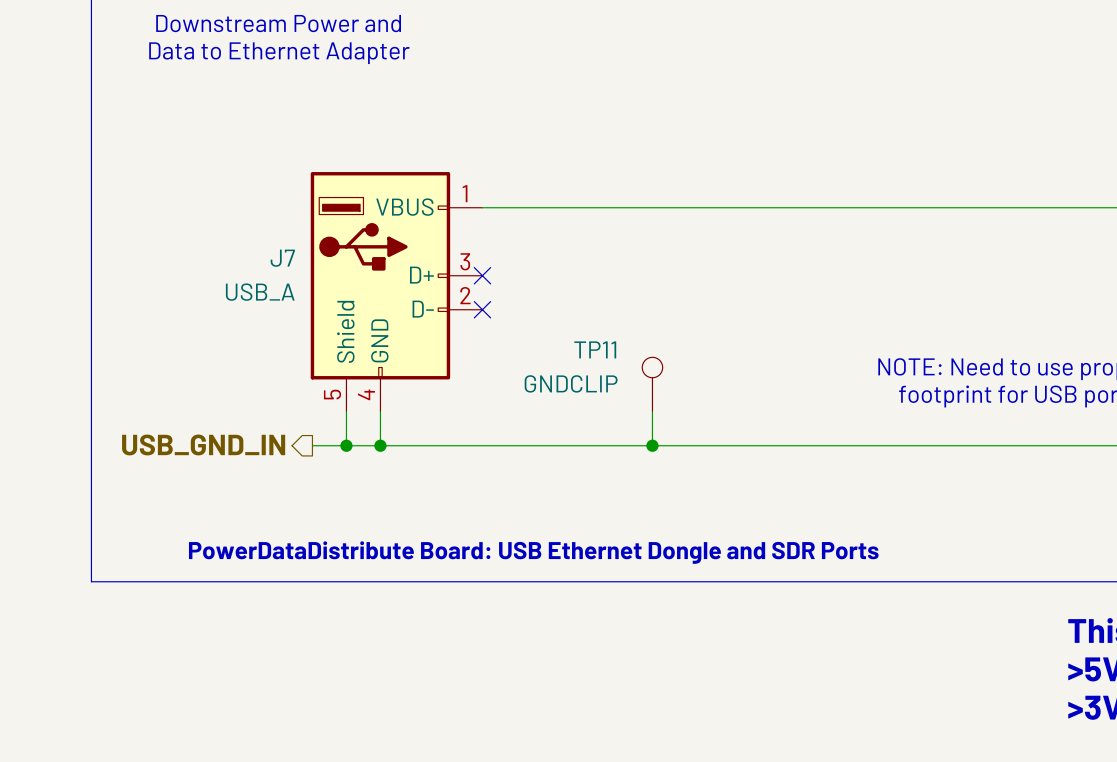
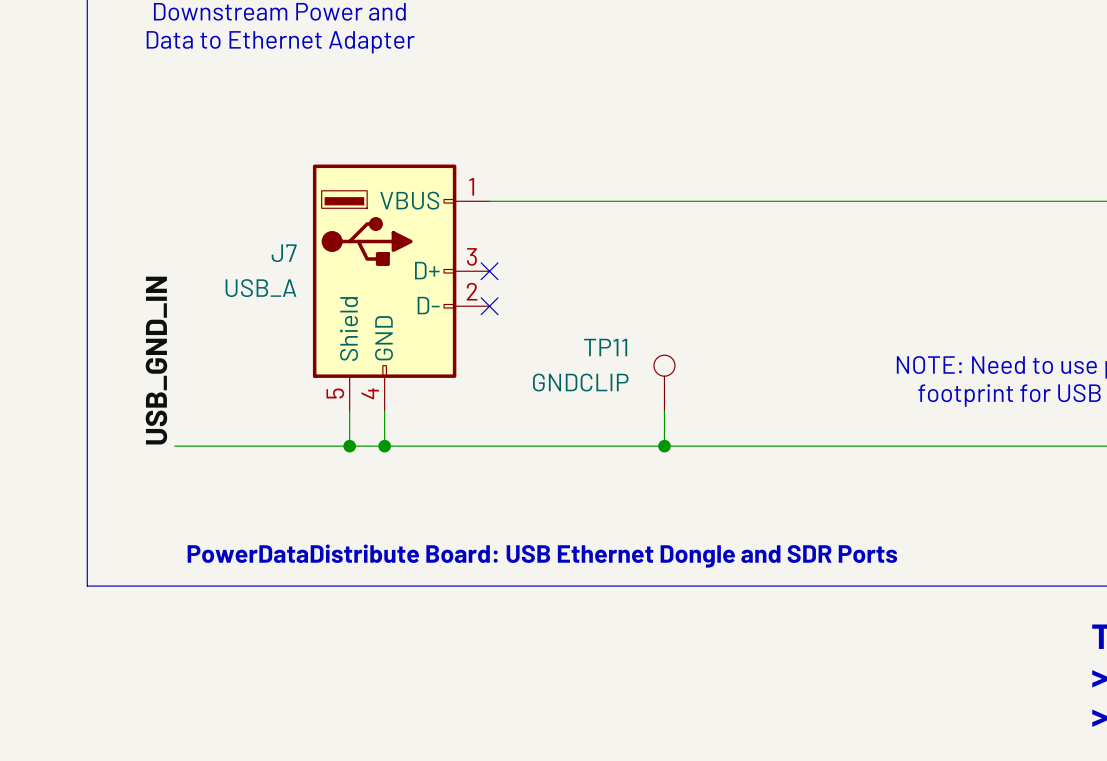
label: none -> USB_GND_IN (156, 360)
hierarchical label: USB_GND_IN (203, 444) -> none
wire: none -> (174, 446) (314, 446)

